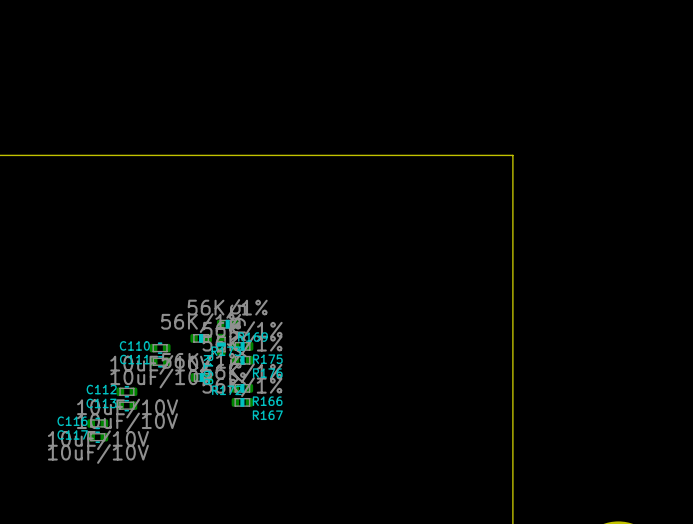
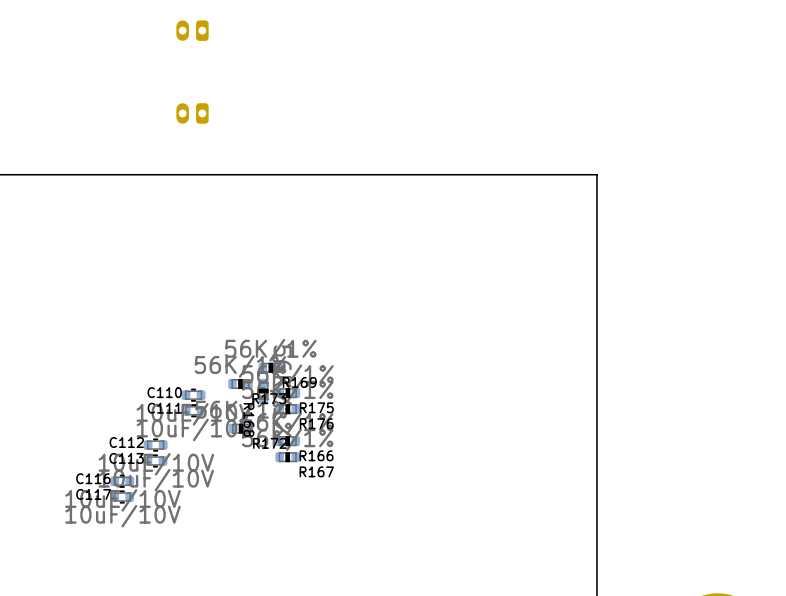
part: none -> (192, 30)
part: none -> (192, 113)

